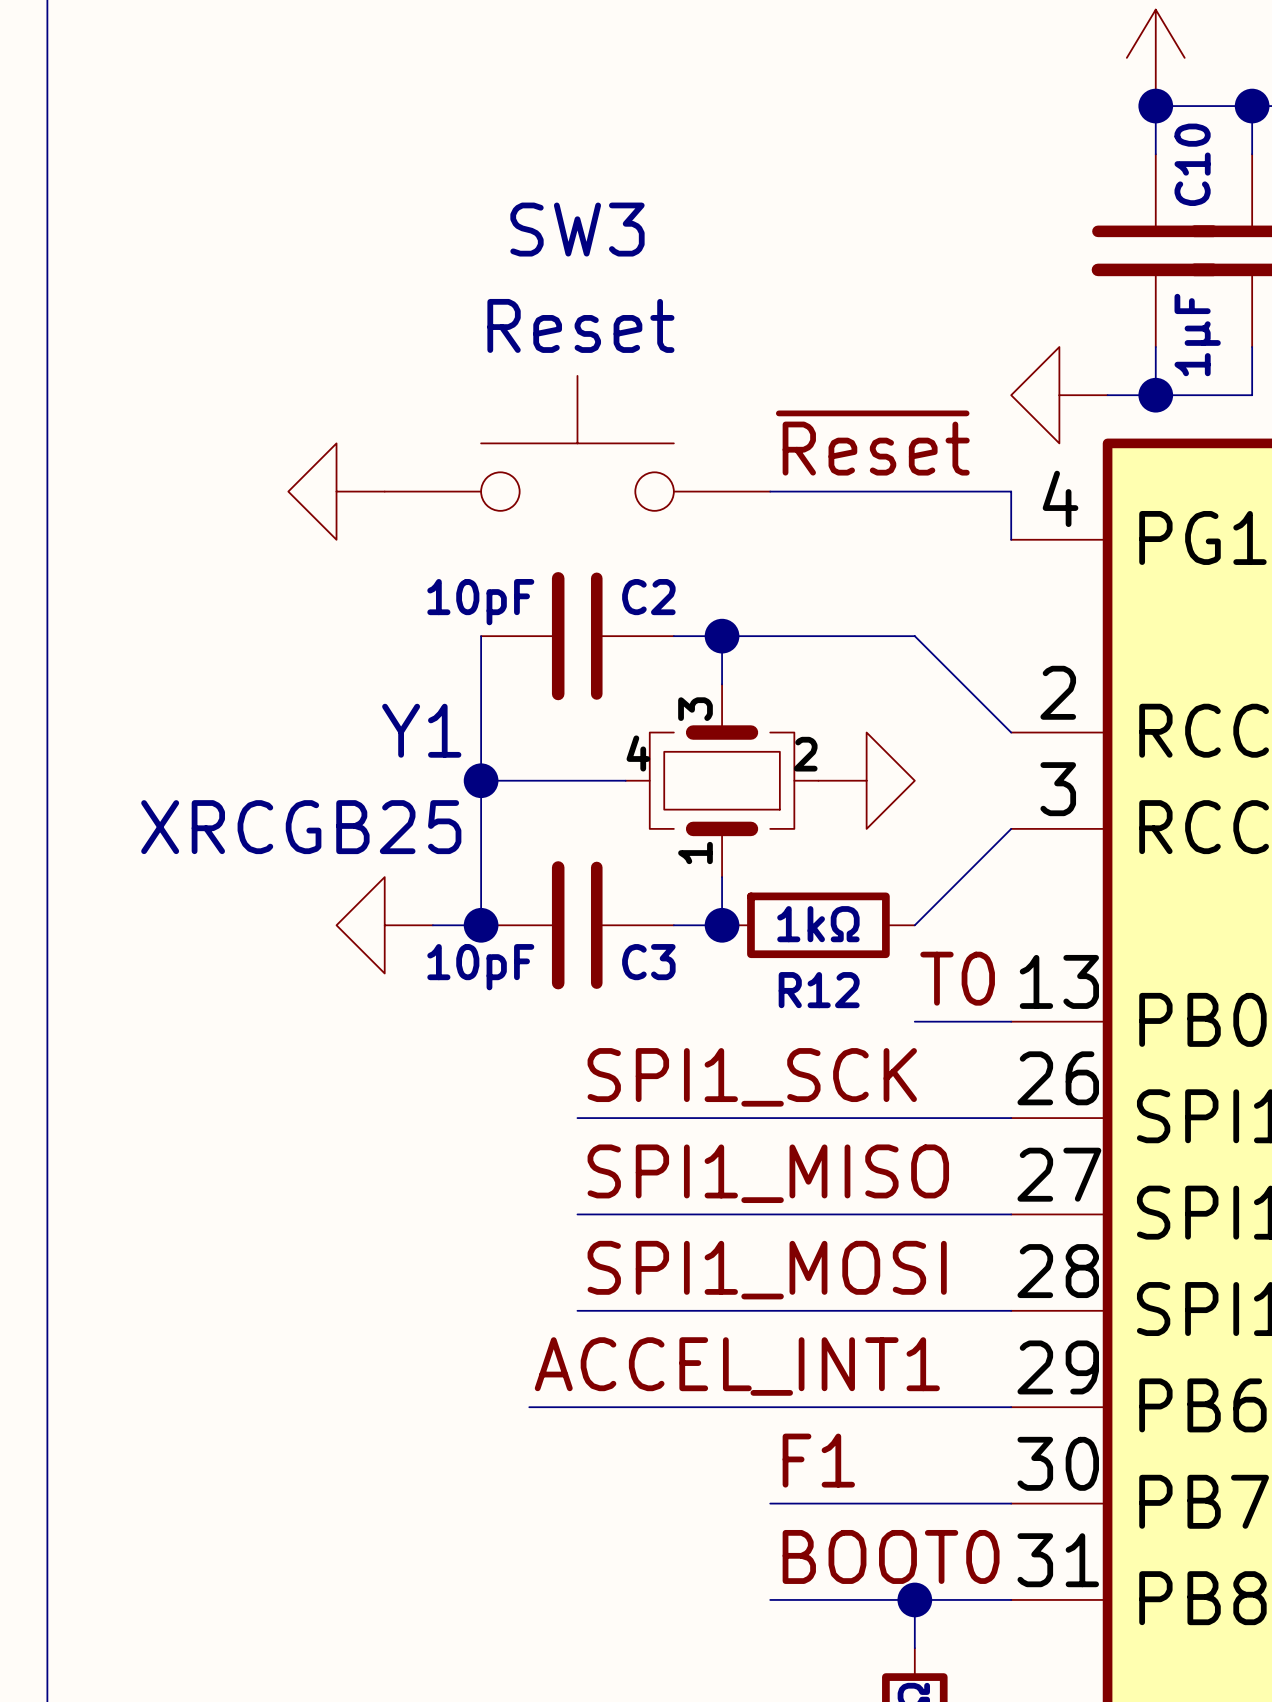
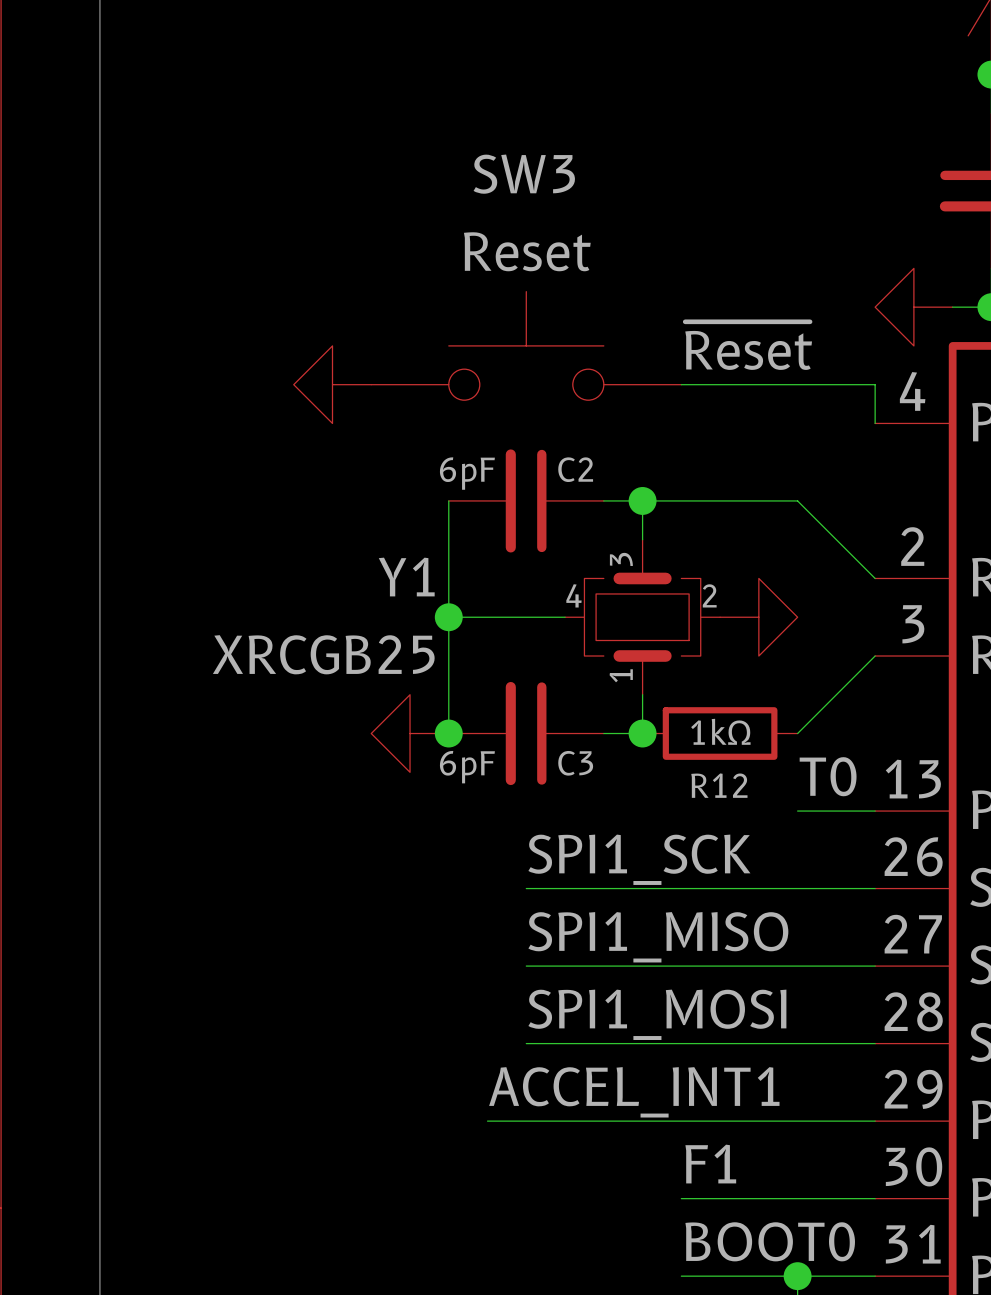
C2 value: 10pF (480, 602) -> 6pF (467, 473)
power symbol position: (384, 925) -> (410, 733)
C3 value: 10pF (480, 967) -> 6pF (467, 767)

